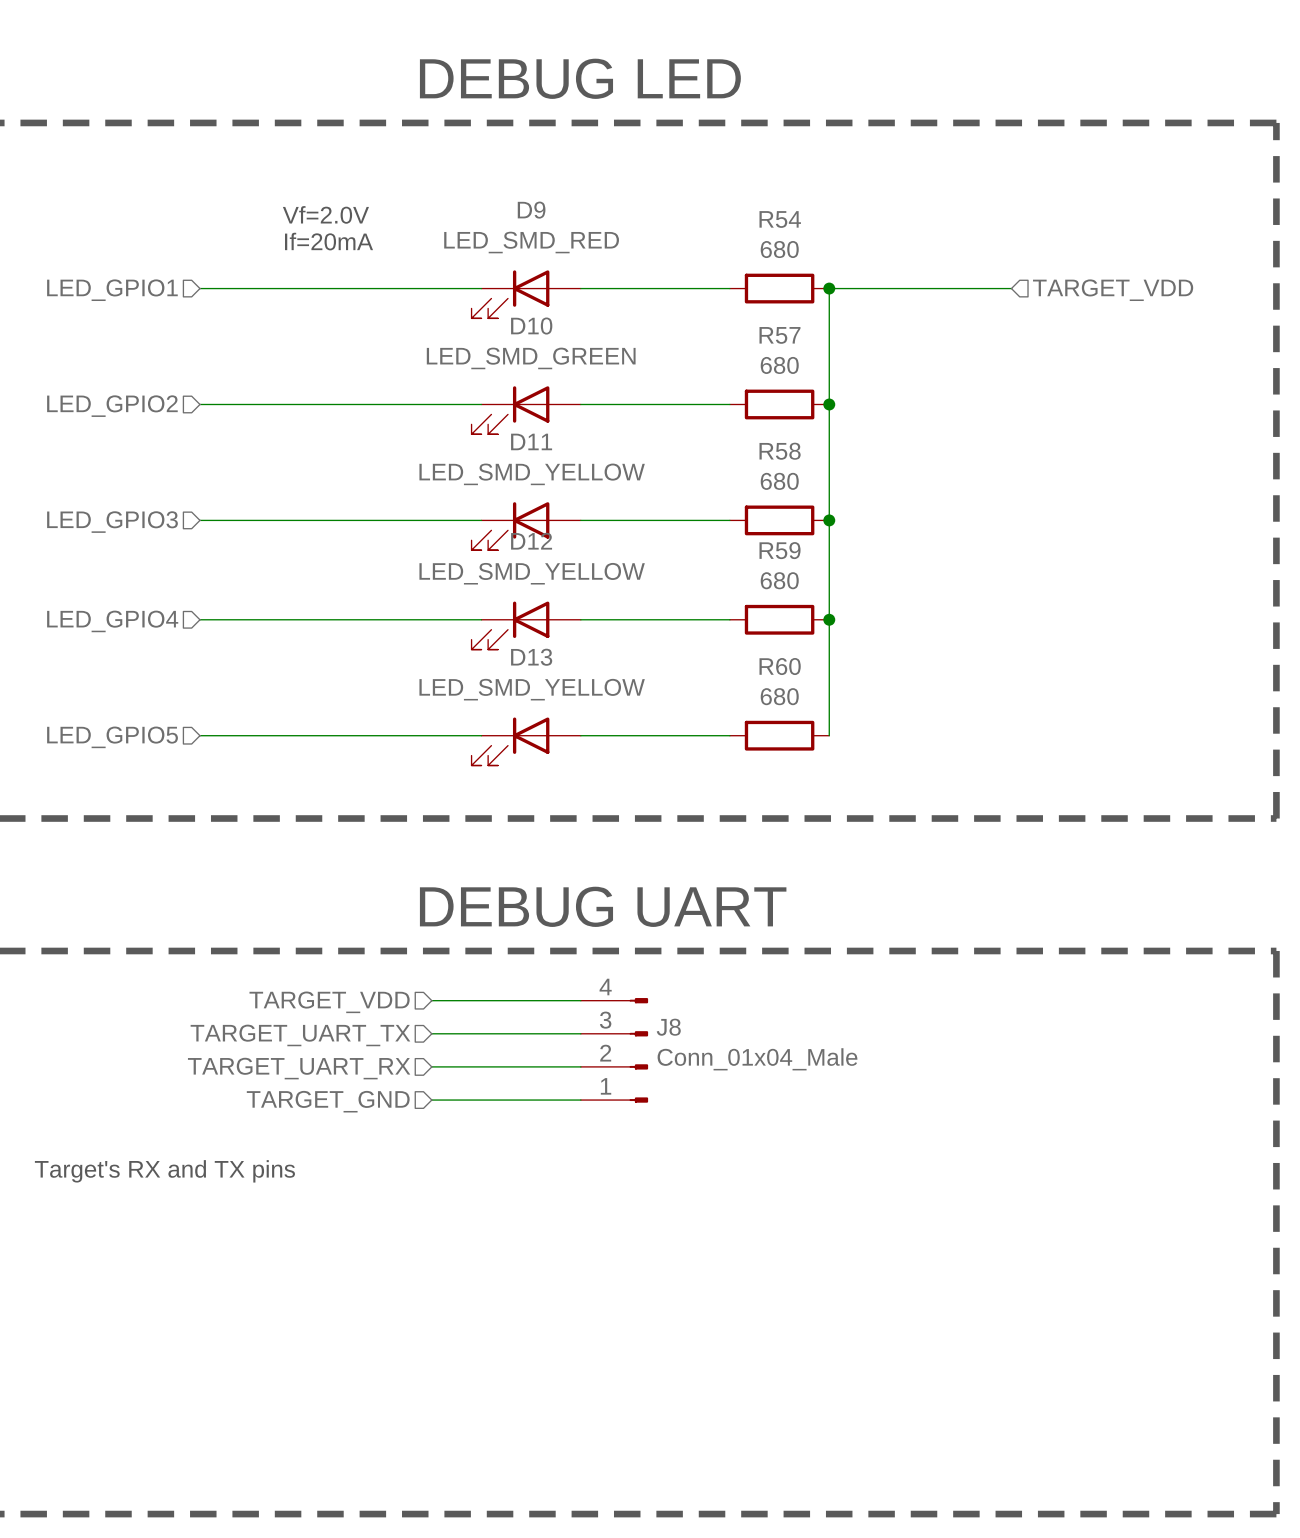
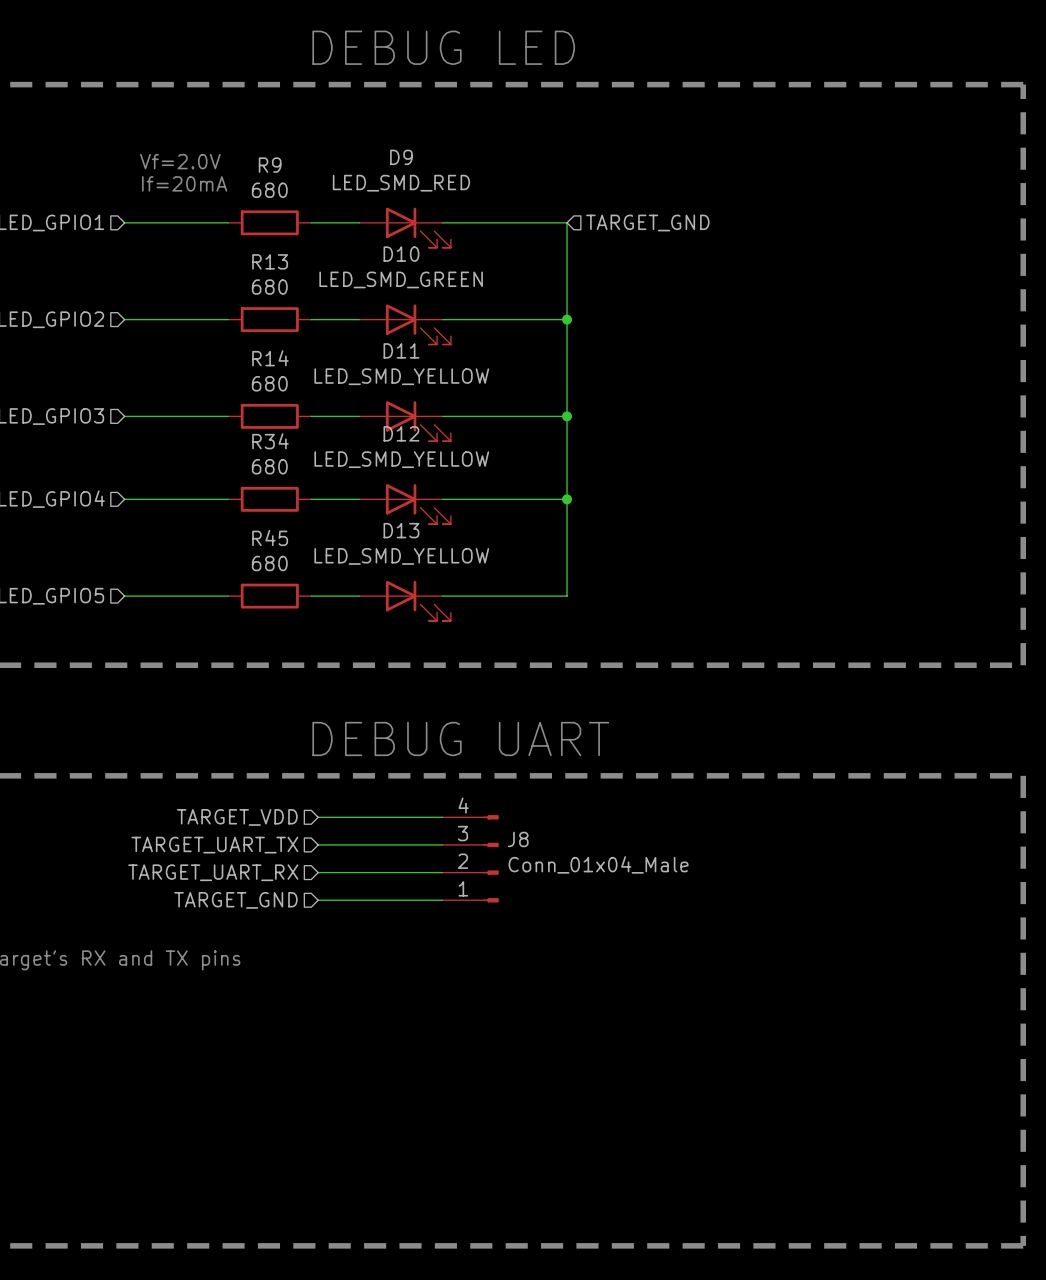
text position: Vf=2.0V (325, 214) -> Vf=2.0V (180, 161)
text position: If=20mA (329, 241) -> If=20mA (184, 183)
wire: (324, 288) (423, 288) -> none
R9: none -> 680 (269, 222)
wire: none -> (567, 222) (567, 596)
R54: 680 (779, 288) -> none
junction: (829, 288) -> none
wire: (1011, 288) (829, 288) (829, 735) -> none
hierarchical label: none -> TARGET_GND (647, 222)
hierarchical label: TARGET_VDD (1113, 290) -> none
D9 flip: as is (510, 294) -> left-right (418, 227)
wire: (324, 404) (423, 404) -> none
R13: none -> 680 (269, 319)
junction: none -> (567, 319)
R57: 680 (779, 404) -> none
junction: (829, 404) -> none
D10 flip: as is (510, 410) -> left-right (418, 324)
wire: (324, 520) (423, 520) -> none
R14: none -> 680 (269, 416)
junction: none -> (567, 416)
R58: 680 (779, 520) -> none
junction: (829, 520) -> none
D11 flip: as is (510, 526) -> left-right (418, 421)
wire: (324, 619) (423, 619) -> none
R34: none -> 680 (269, 499)
junction: none -> (567, 499)
R59: 680 (779, 619) -> none
junction: (829, 619) -> none
D12 flip: as is (510, 625) -> left-right (418, 504)
wire: (324, 735) (423, 735) -> none
R45: none -> 680 (269, 596)
R60: 680 (779, 735) -> none
D13 flip: as is (510, 741) -> left-right (418, 600)

